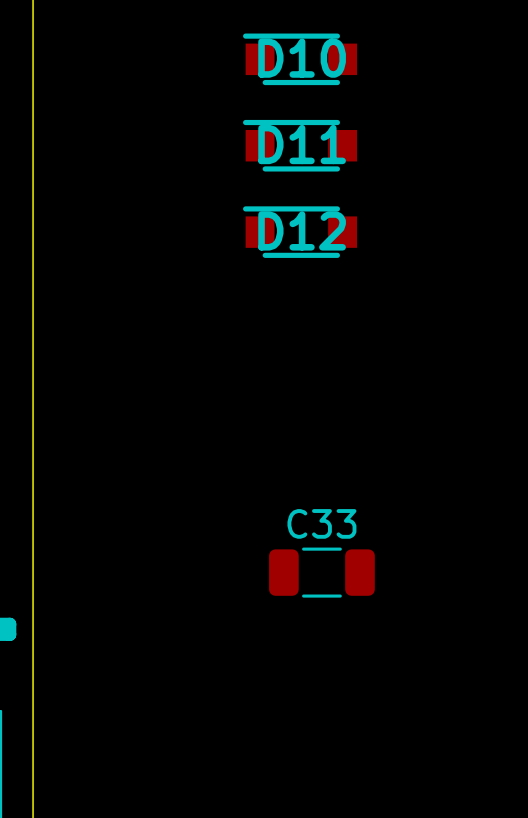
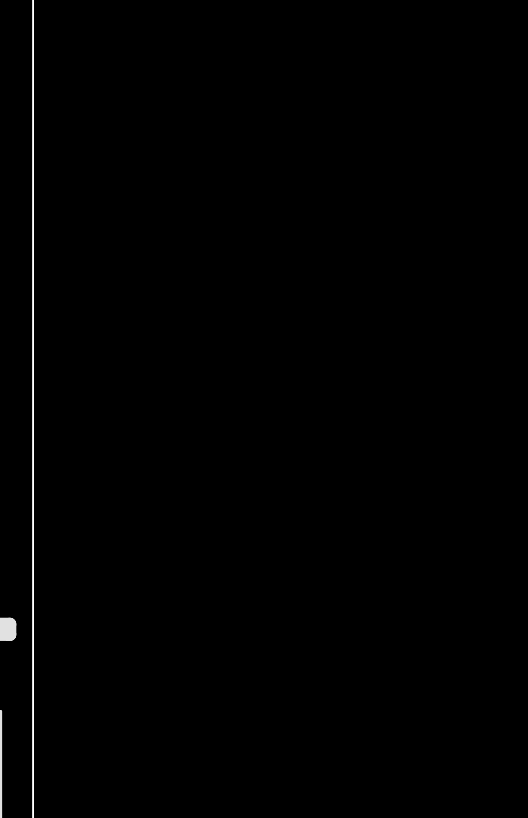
D10: (300, 59) -> none
D11: (300, 145) -> none
D12: (300, 232) -> none
C33: (321, 572) -> none

